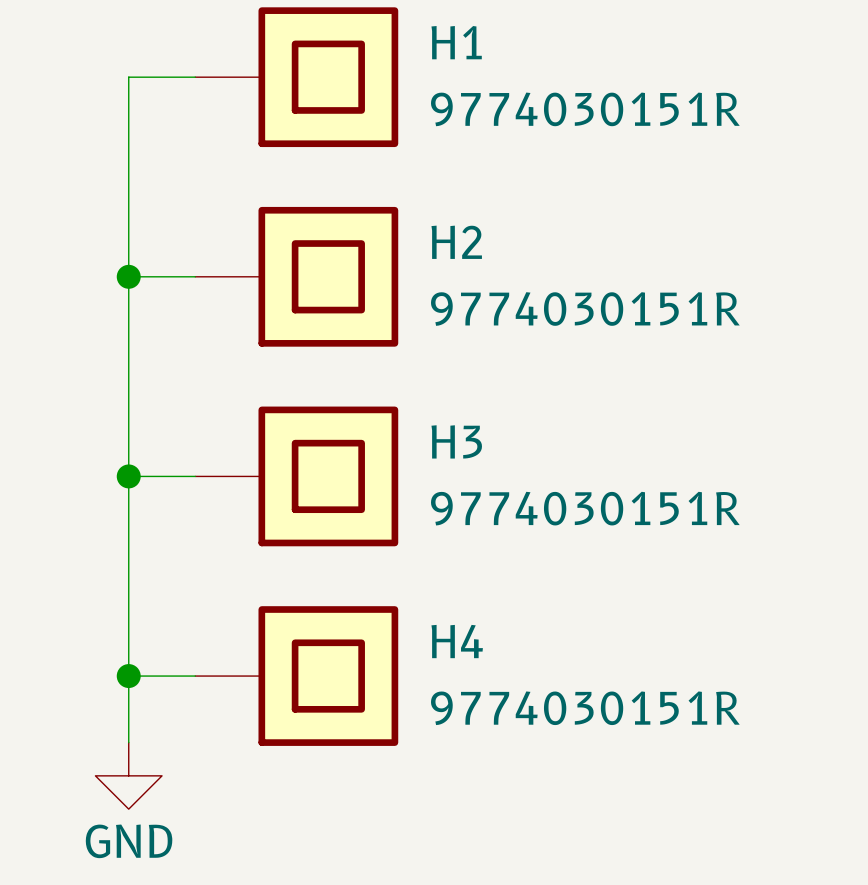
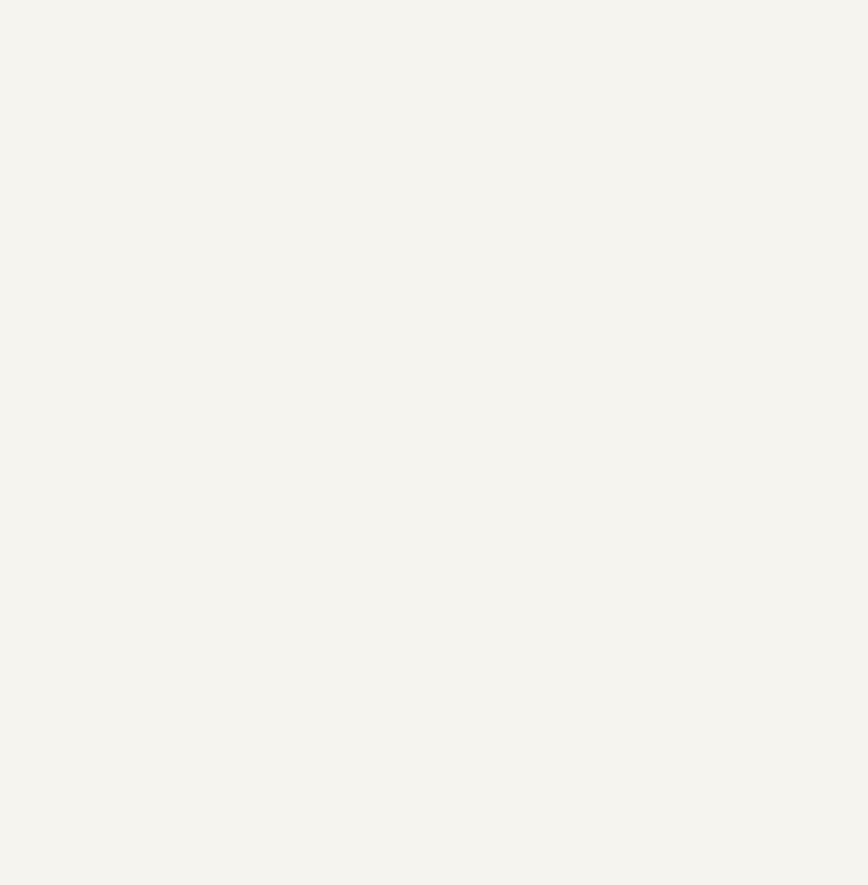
wire: (195, 77) (128, 77) (128, 742) -> none
H1: (296, 77) -> none
wire: (128, 276) (195, 276) -> none
junction: (128, 276) -> none
H2: (296, 276) -> none
wire: (128, 476) (195, 476) -> none
junction: (128, 476) -> none
H3: (296, 476) -> none
wire: (128, 676) (195, 676) -> none
junction: (128, 676) -> none
H4: (296, 676) -> none
power symbol: GND (128, 775) -> none

